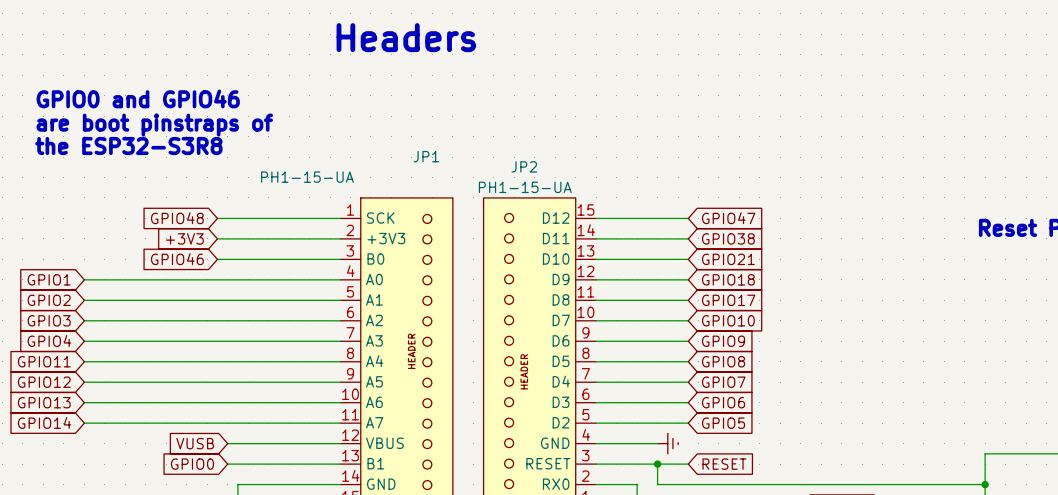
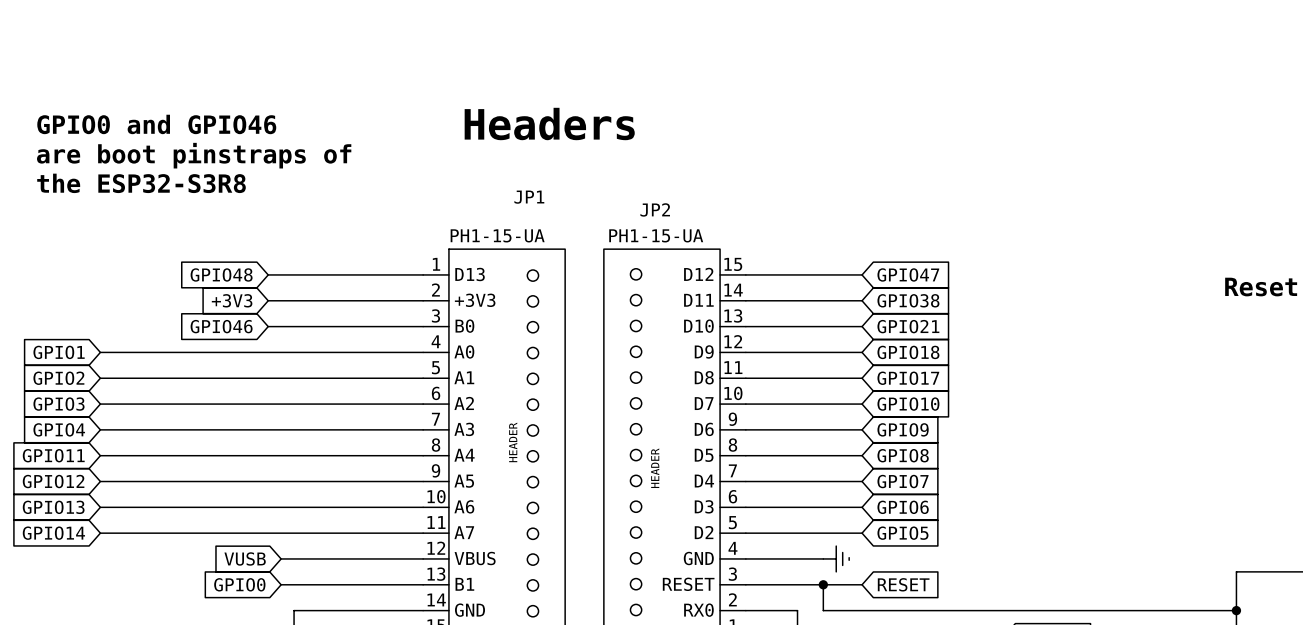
text position: Headers (406, 37) -> Headers (549, 124)
JP1 value position: PH1-15-UA (307, 177) -> PH1-15-UA (497, 235)
JP1 pin name: SCK (380, 218) -> D13 (470, 274)

